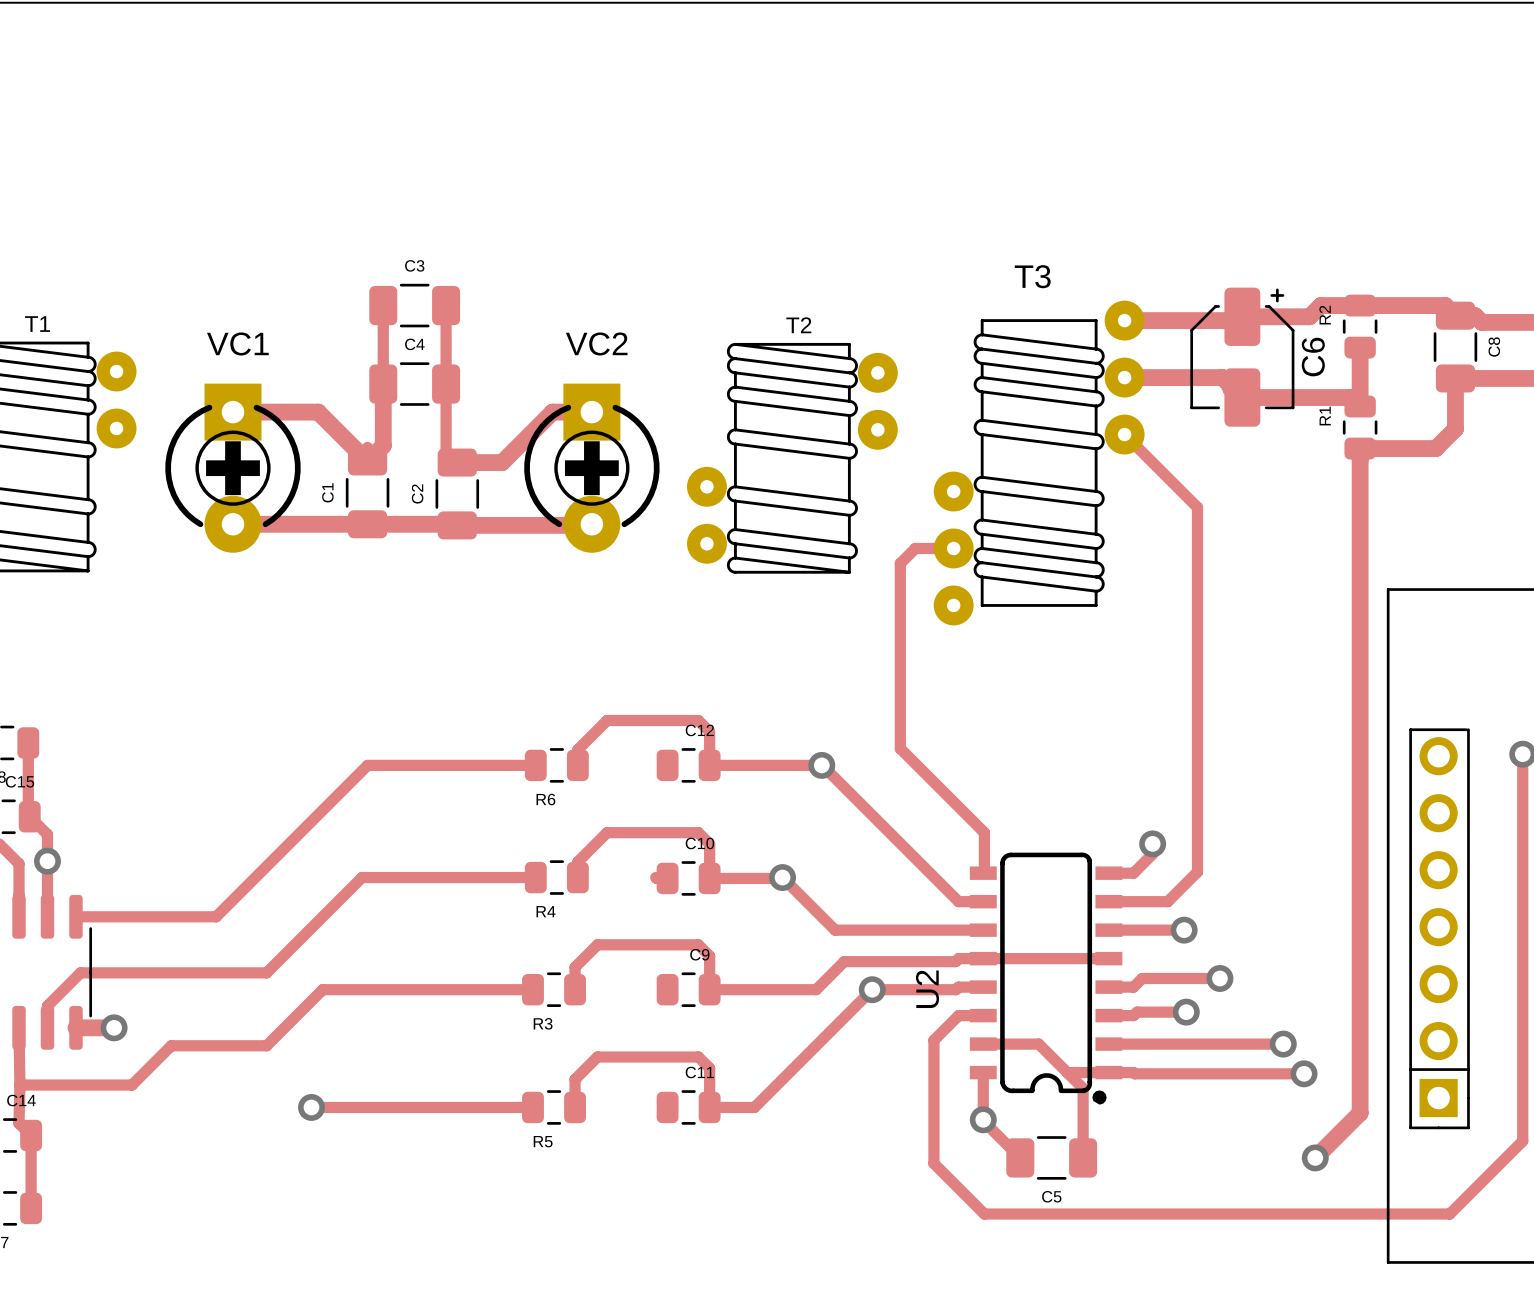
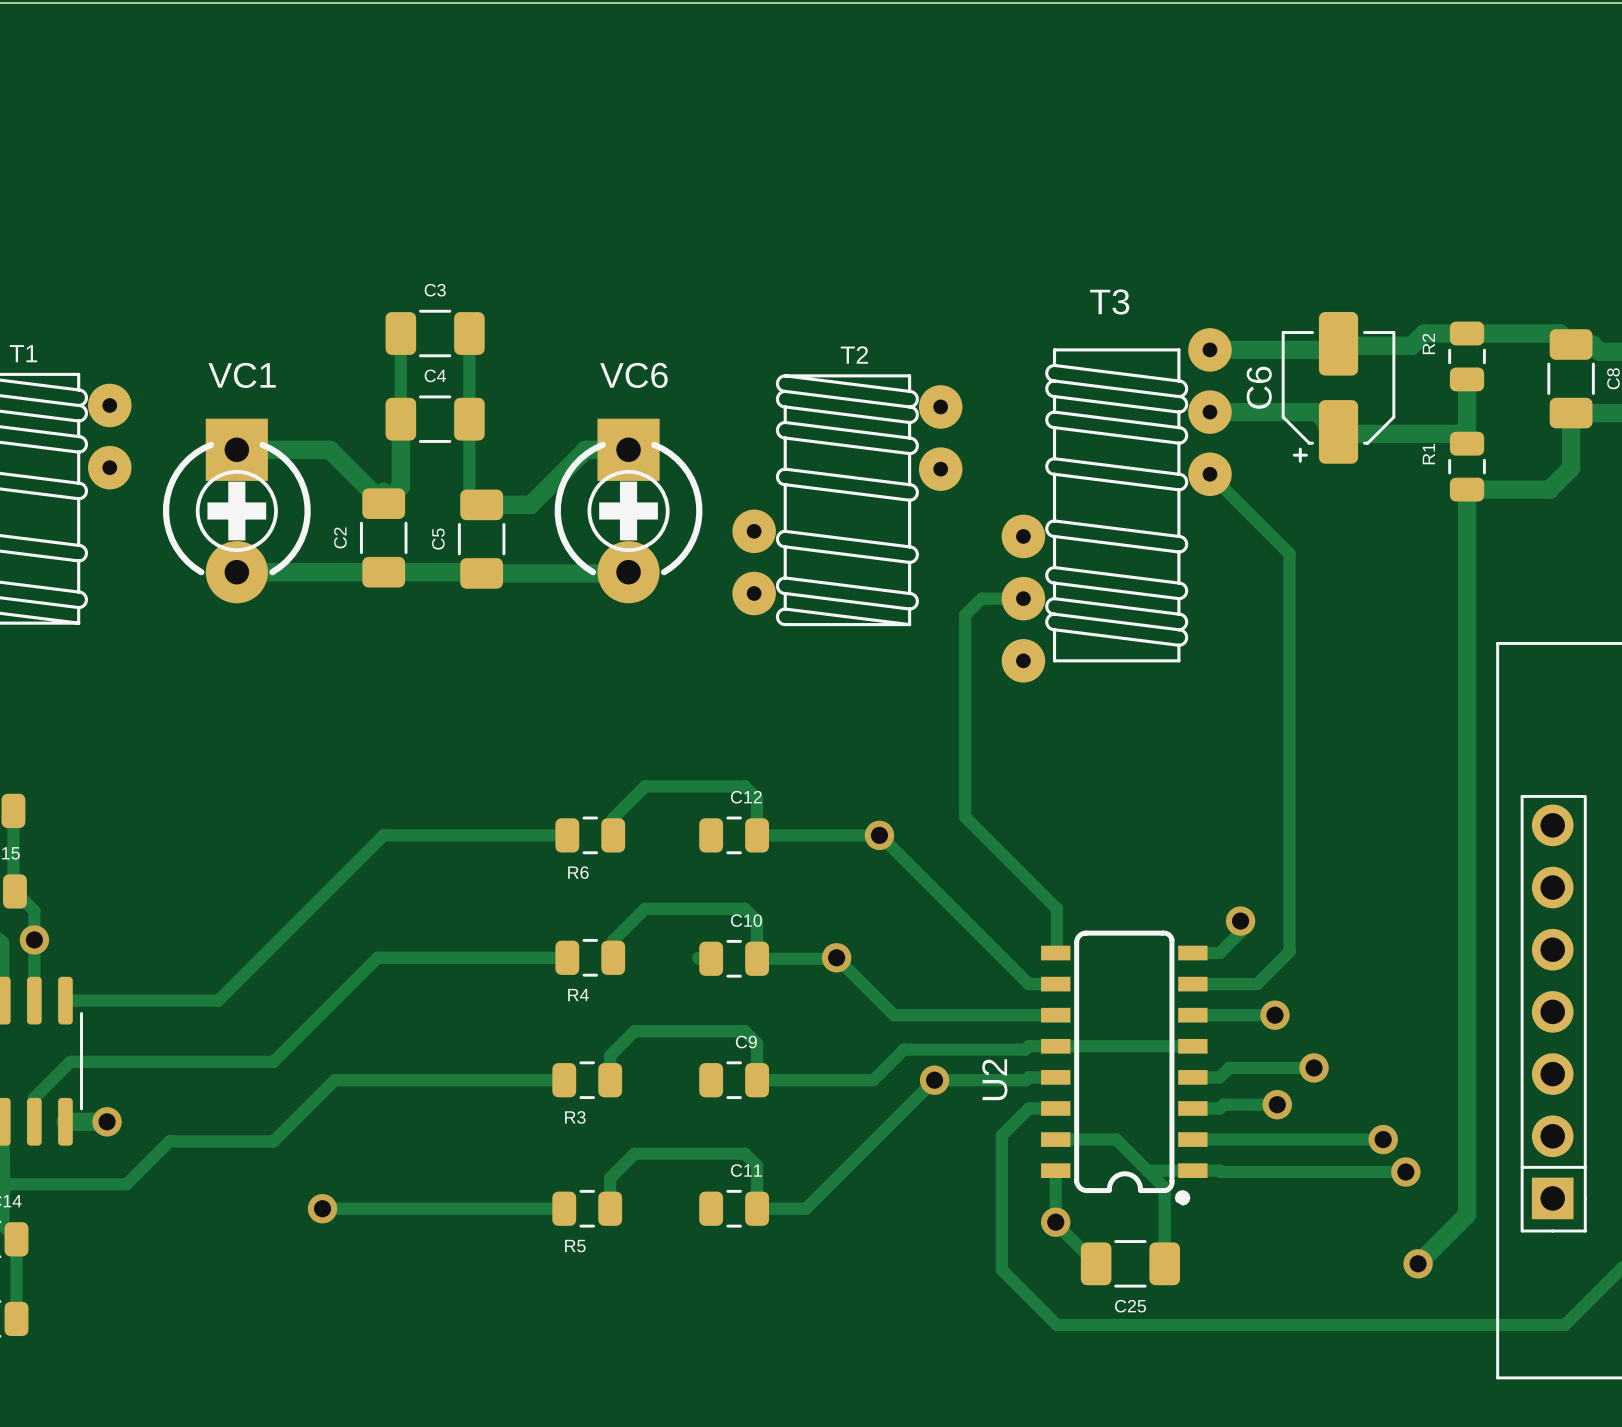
VC2 name: VC2 (596, 343) -> VC6 (633, 375)
C6 rotation: 0° (1242, 357) -> 180° (1338, 387)
C1 name: C1 (327, 492) -> C2 (340, 537)
C2 name: C2 (417, 493) -> C5 (438, 539)
C5 name: C5 (1051, 1196) -> C25 (1130, 1306)

